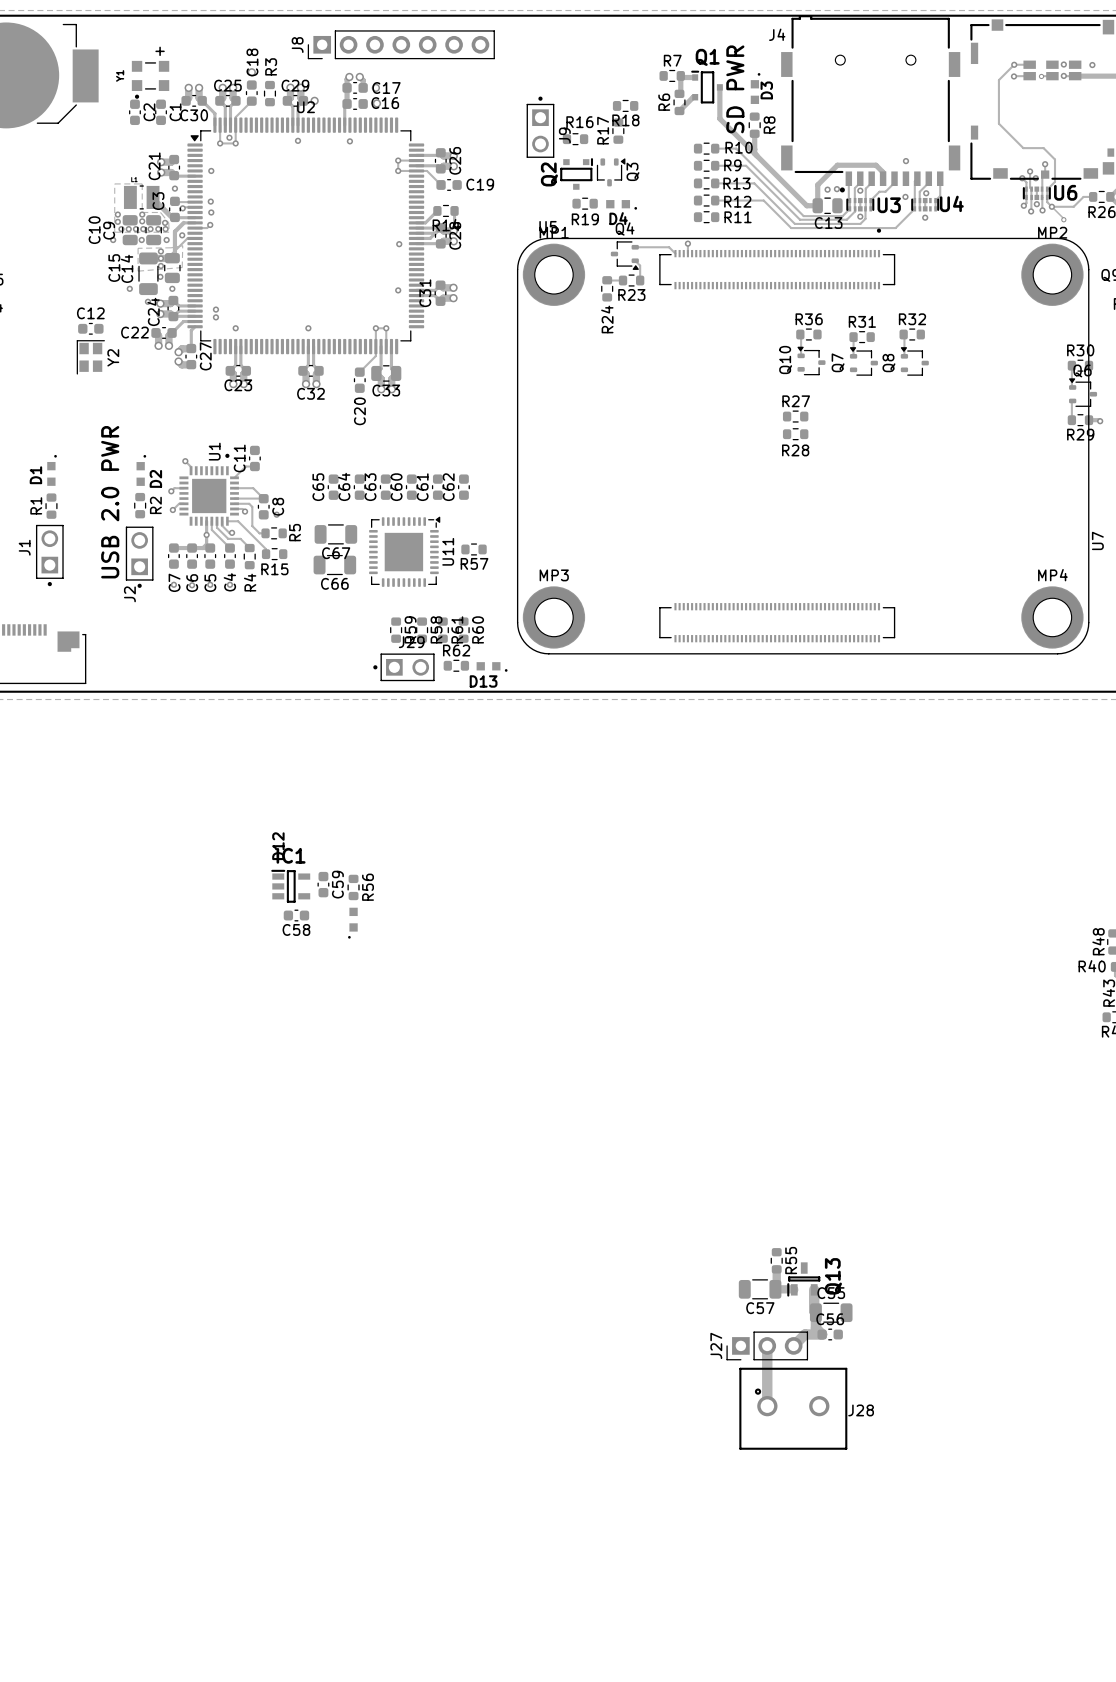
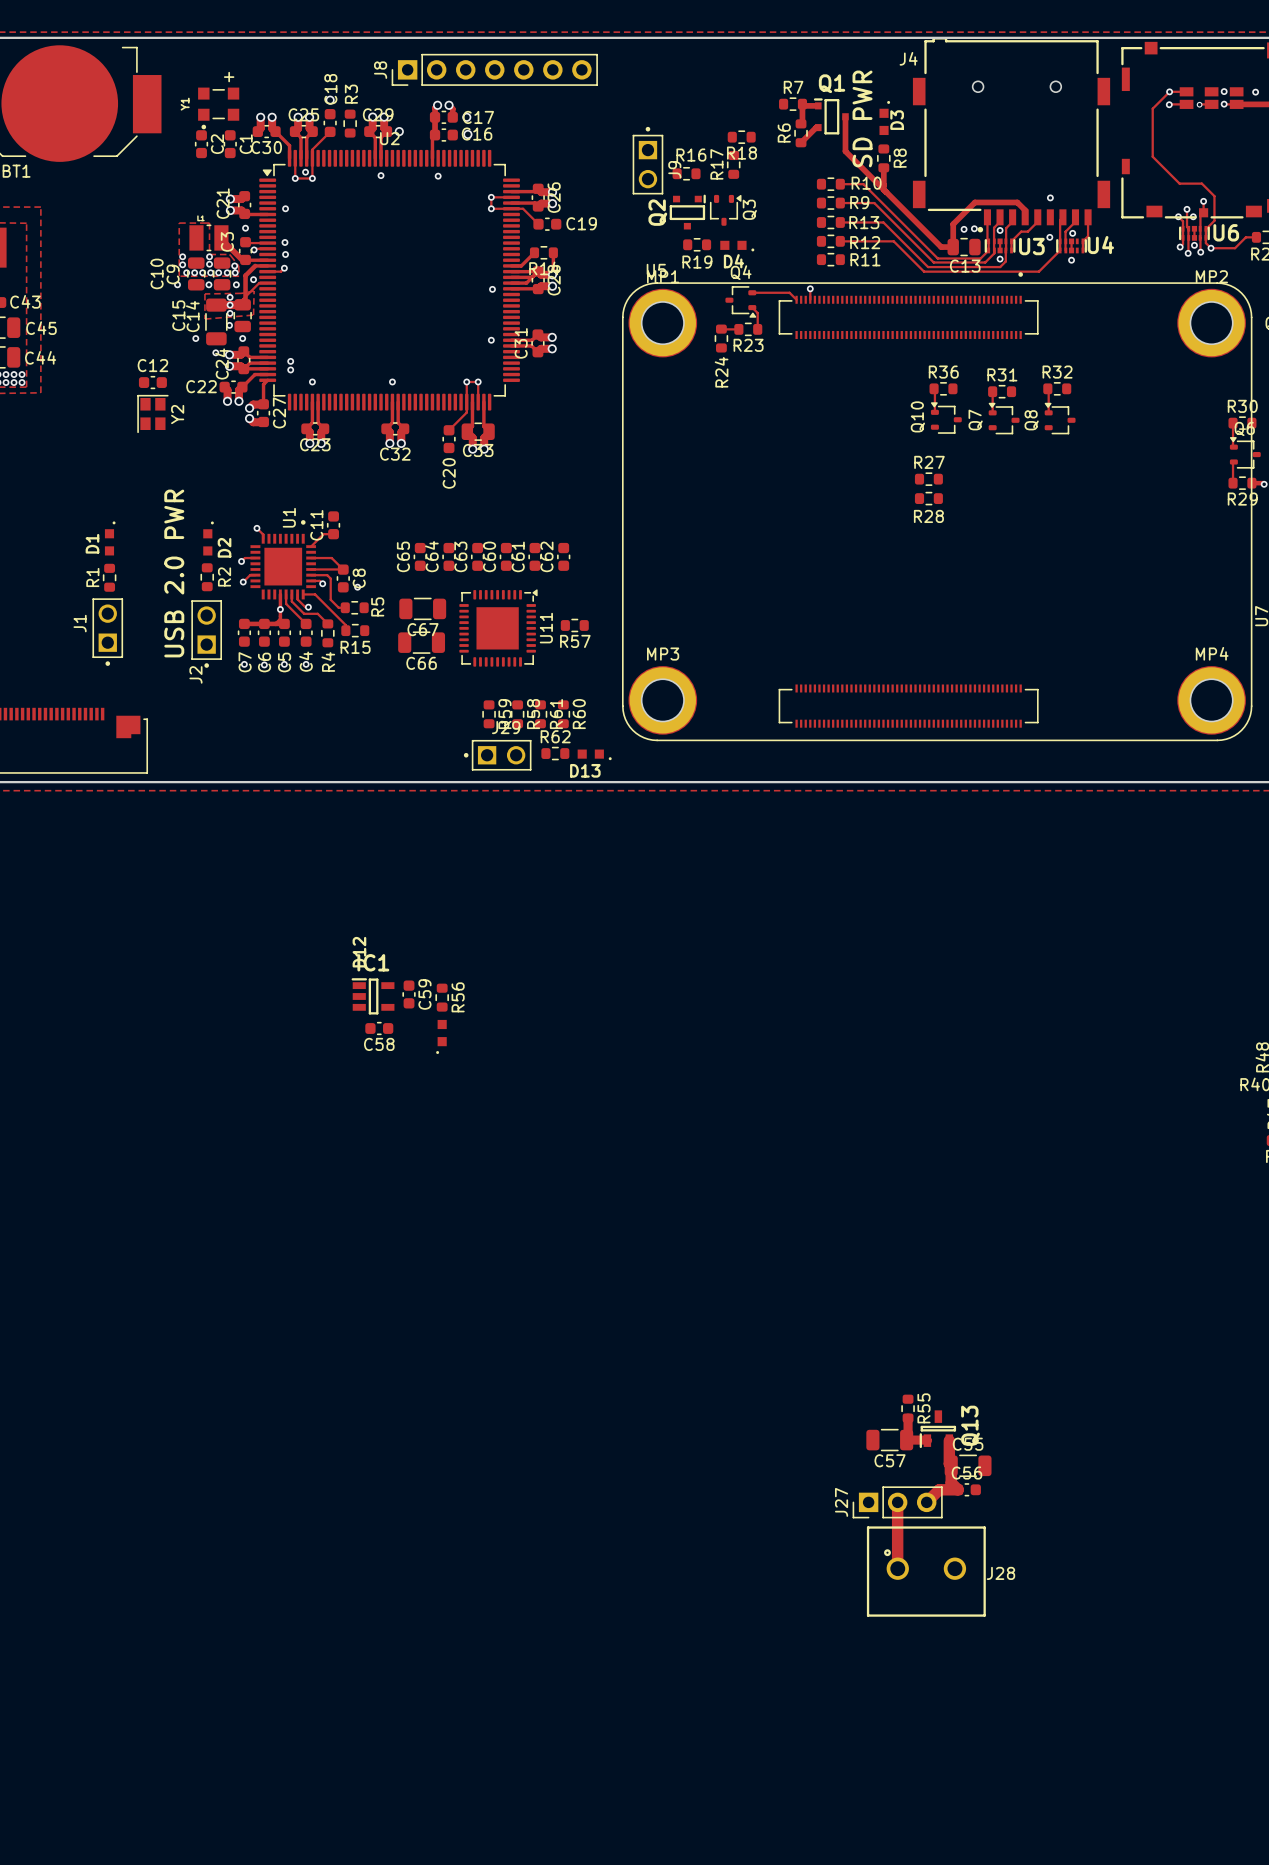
track: (1051, 206) (1063, 219) -> none
via: (1063, 219) -> none

